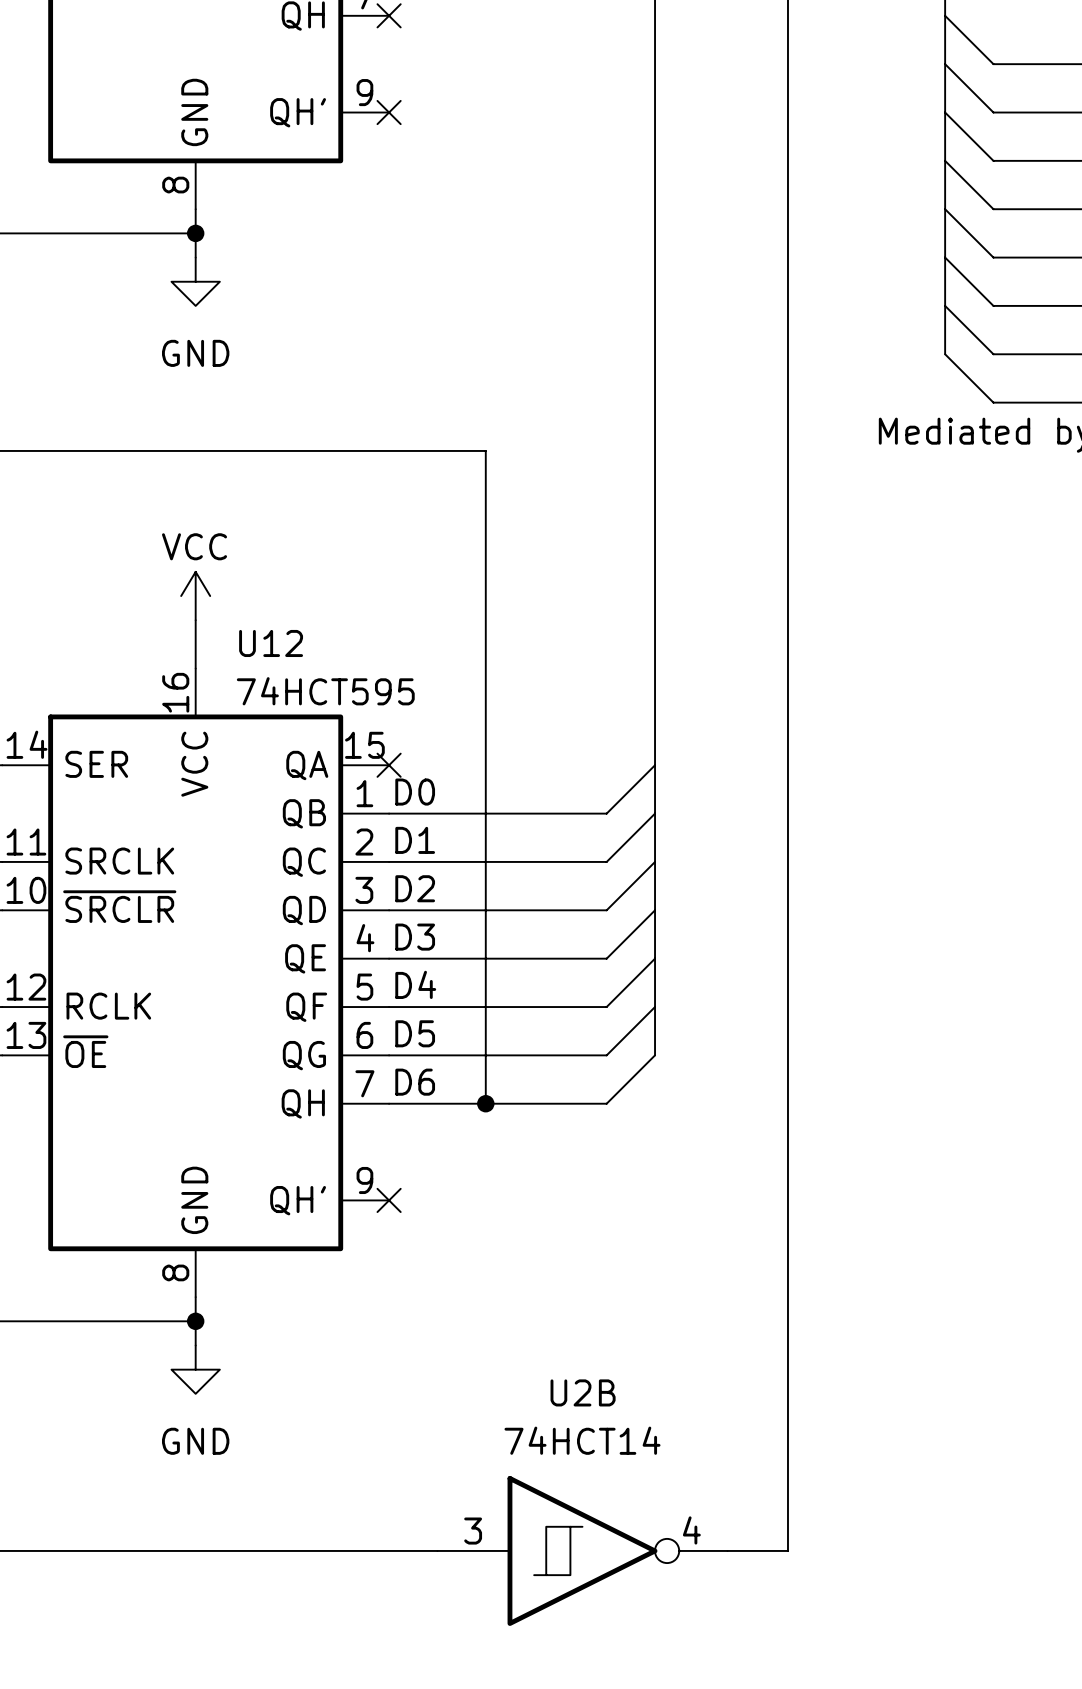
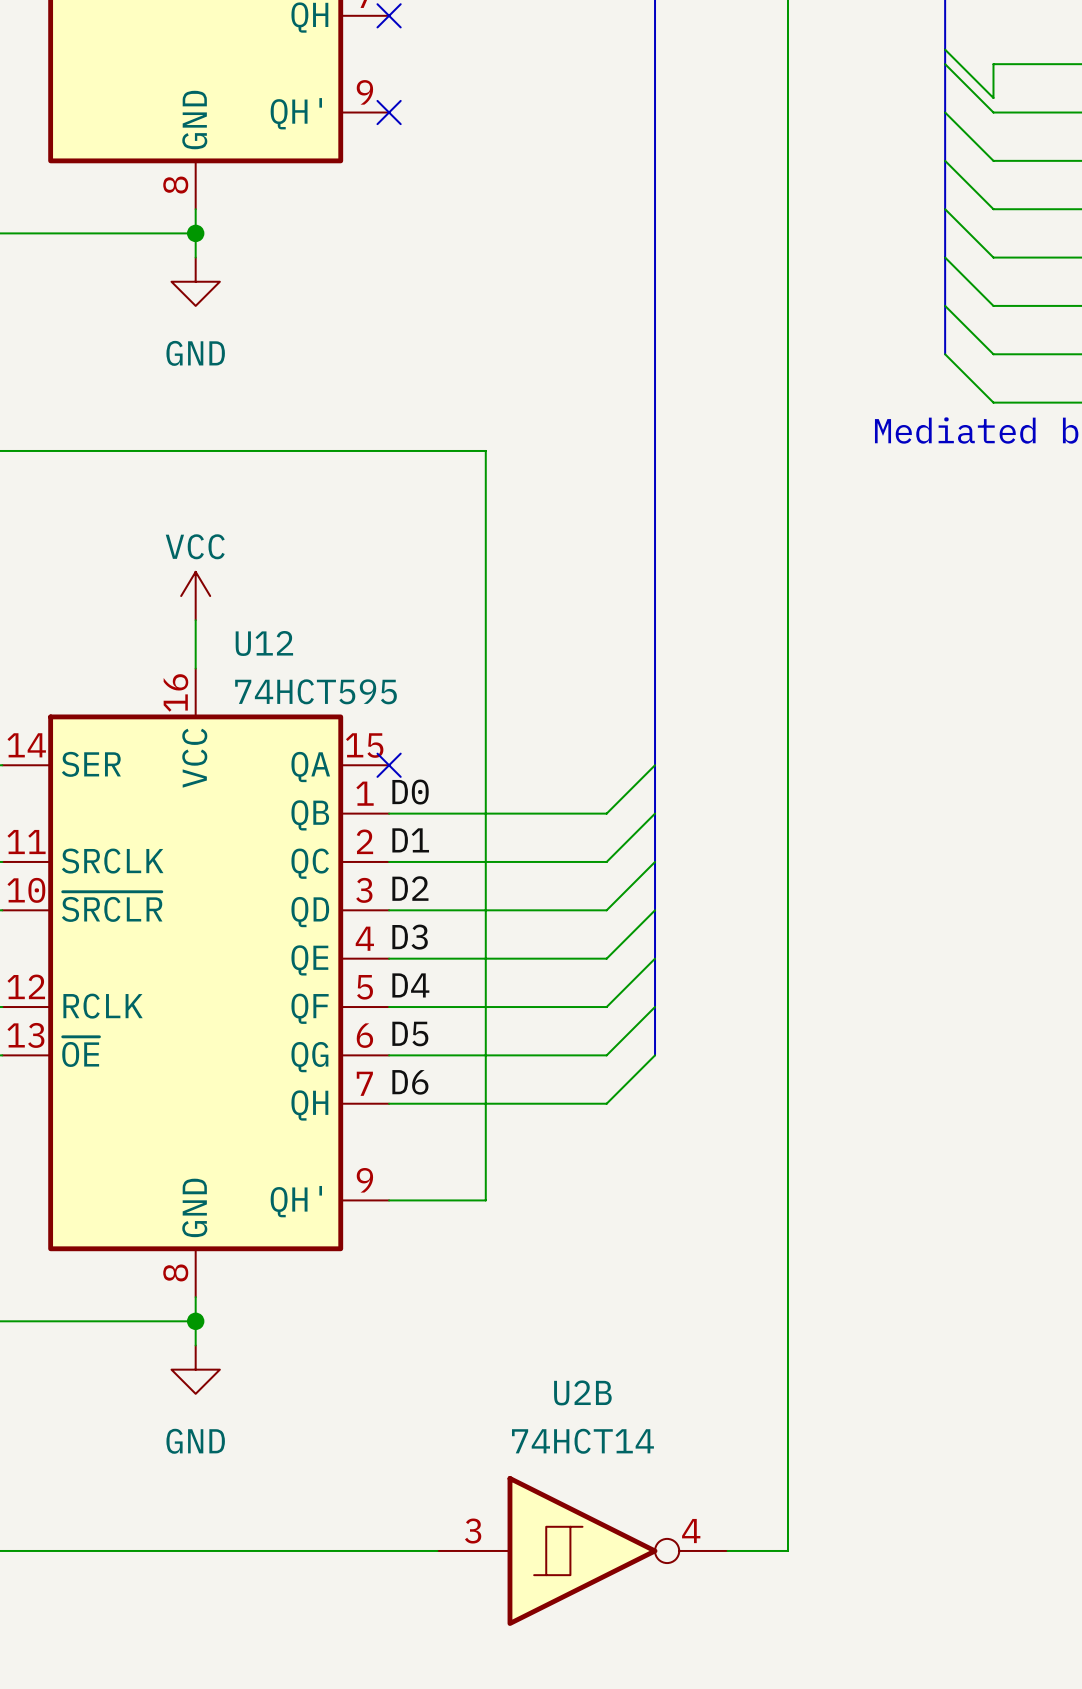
wire: (945, 15) (993, 64) -> (945, 49) (993, 98) (993, 64)
wire: none -> (485, 1103) (485, 1200) (389, 1200)
junction: (485, 1103) -> none
no-connect mark: (389, 1200) -> none

